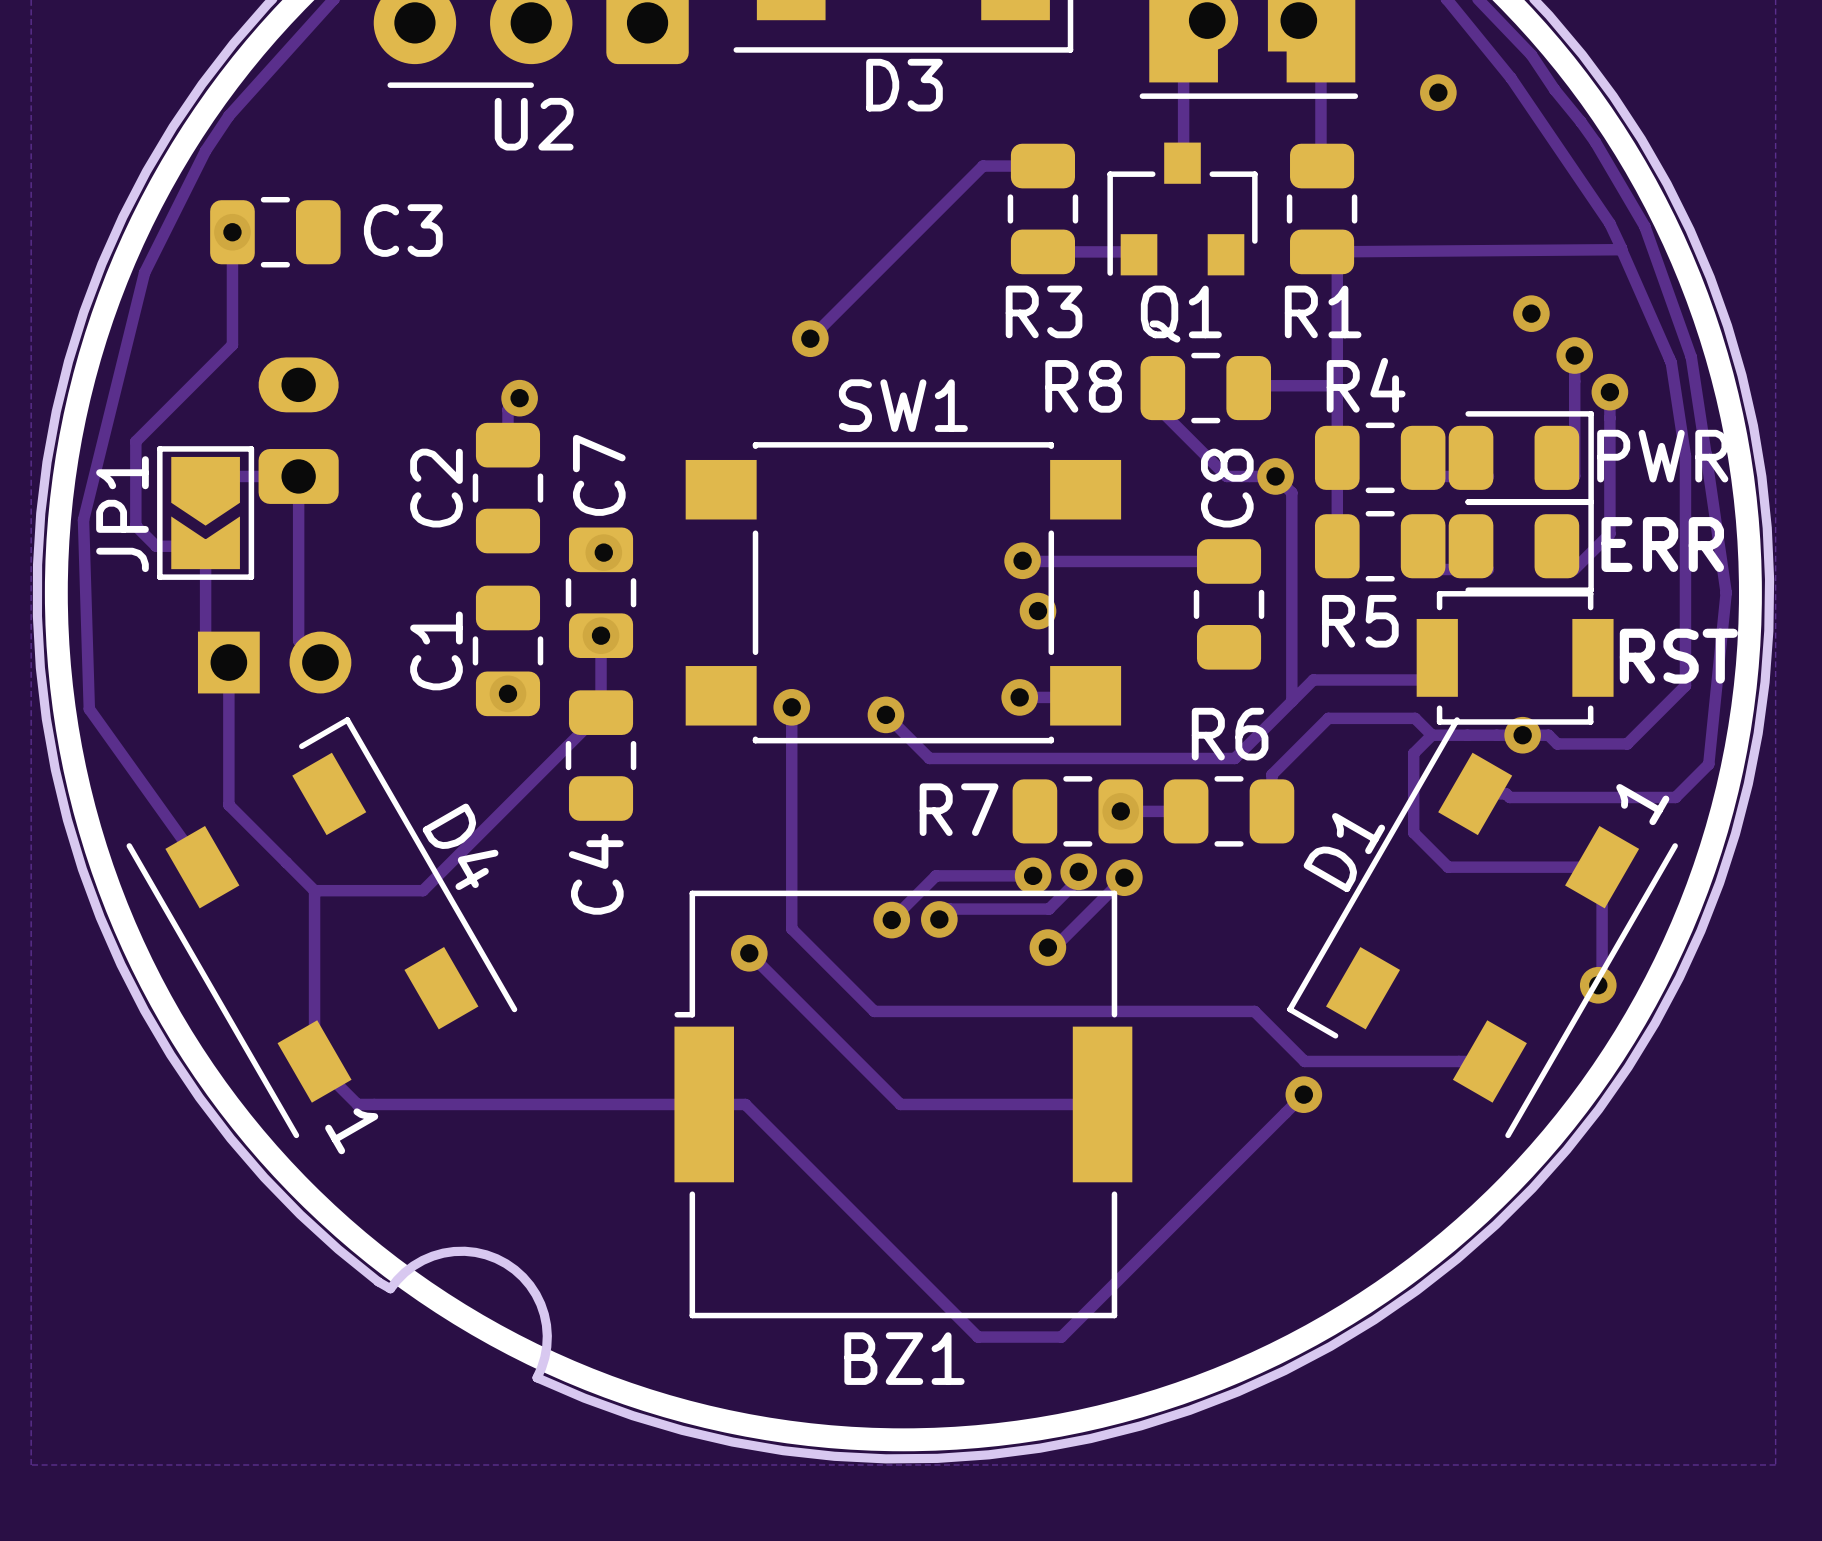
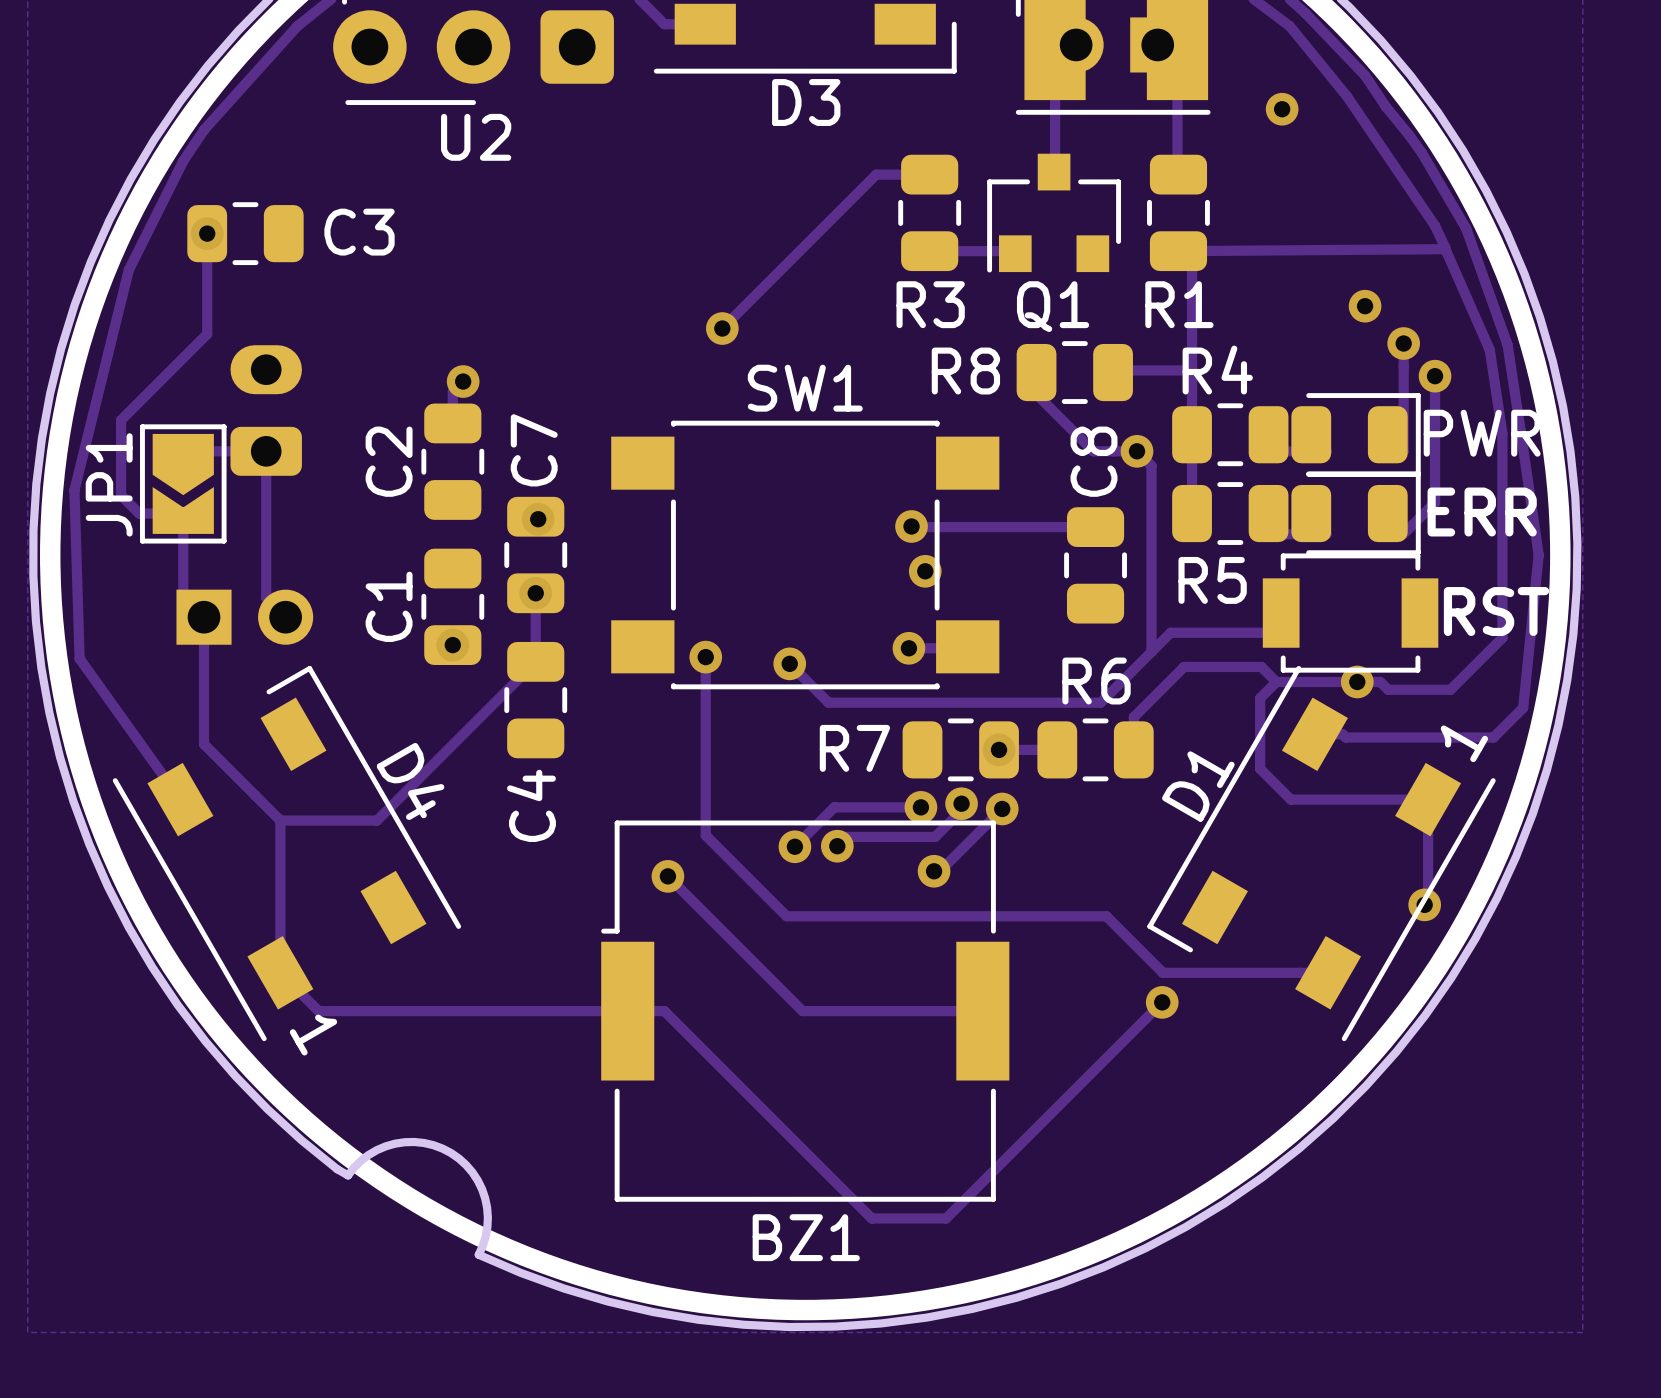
track: (791, 907) (791, 928) (874, 1011) (1254, 1011) -> (705, 835) (786, 916) (1106, 916) (1118, 928)

